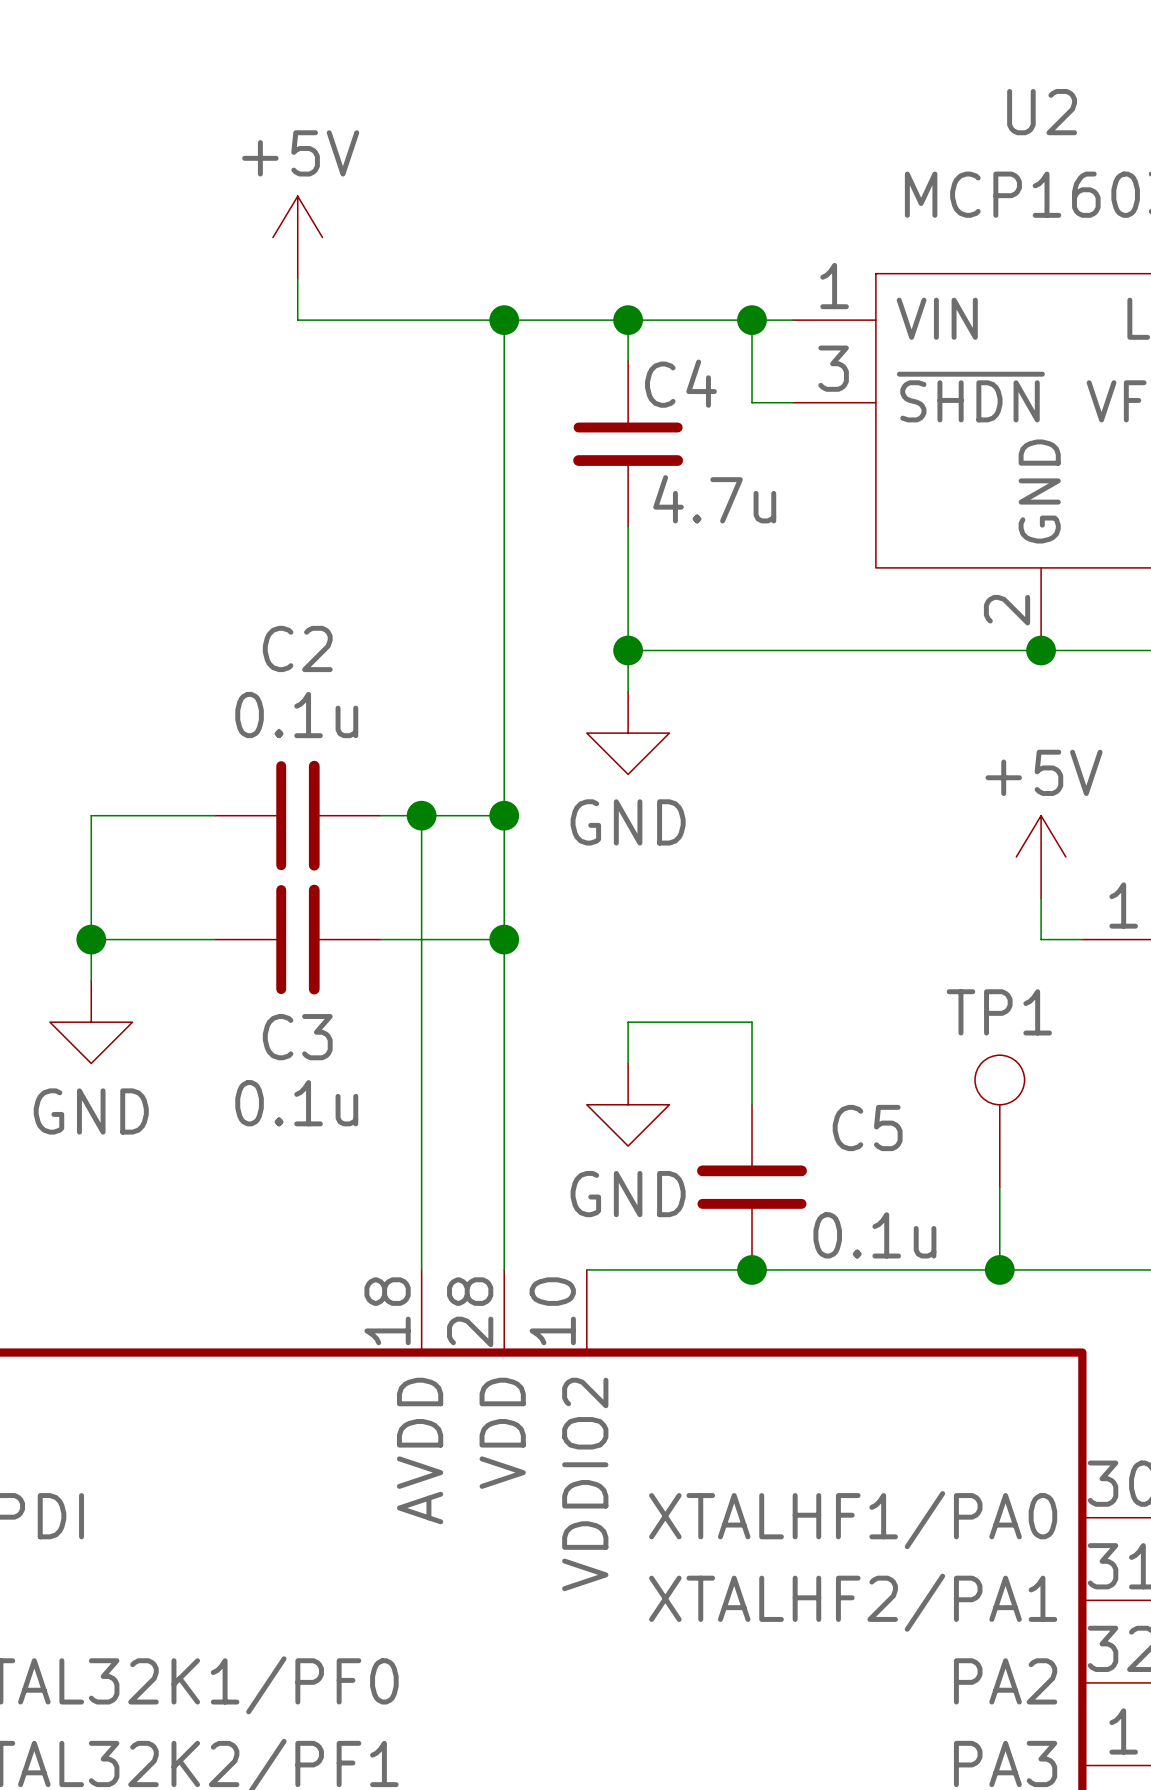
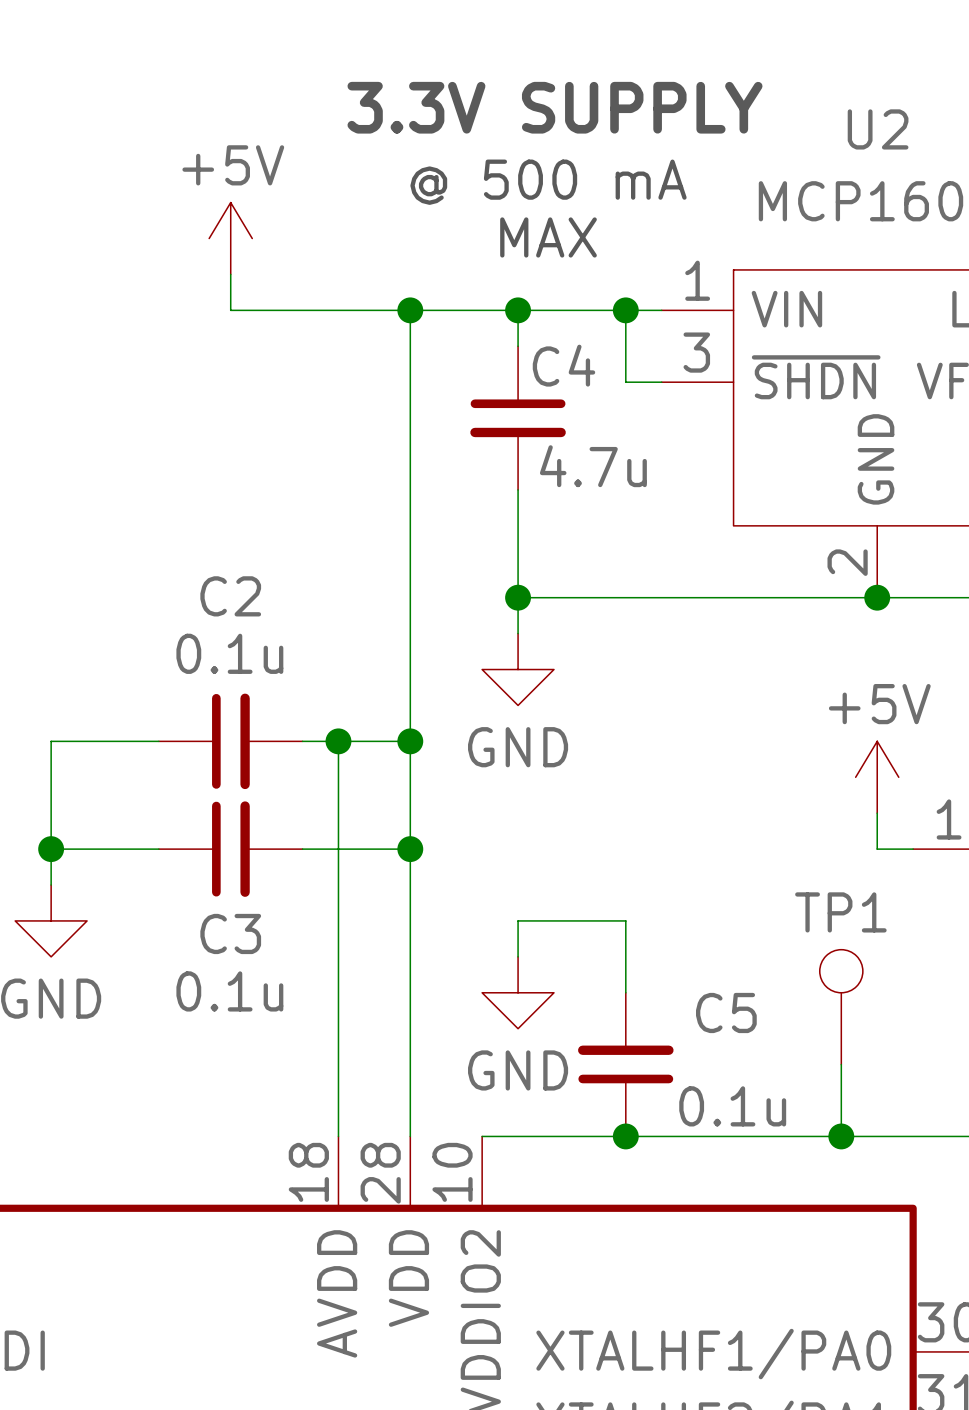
text: none -> 3.3V SUPPLY (555, 107)
text: none -> @ 500 mA (548, 182)
text: none -> MAX (548, 237)

